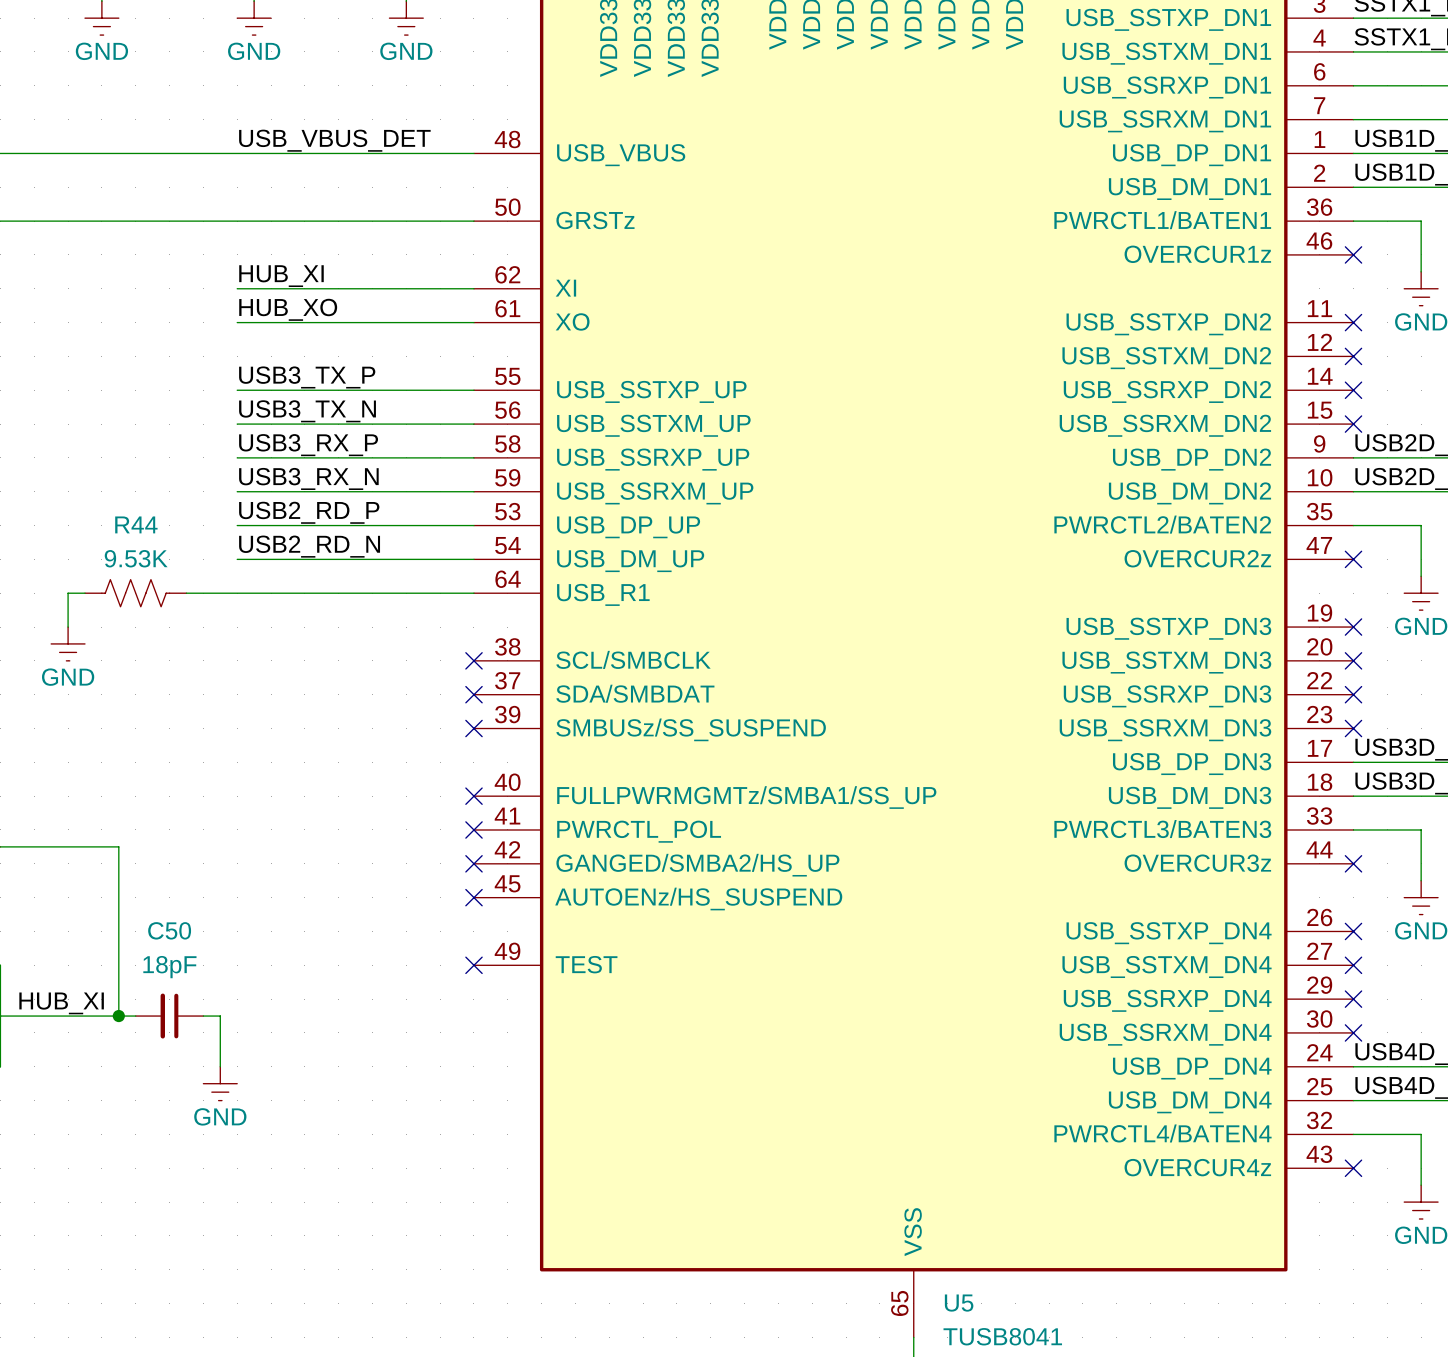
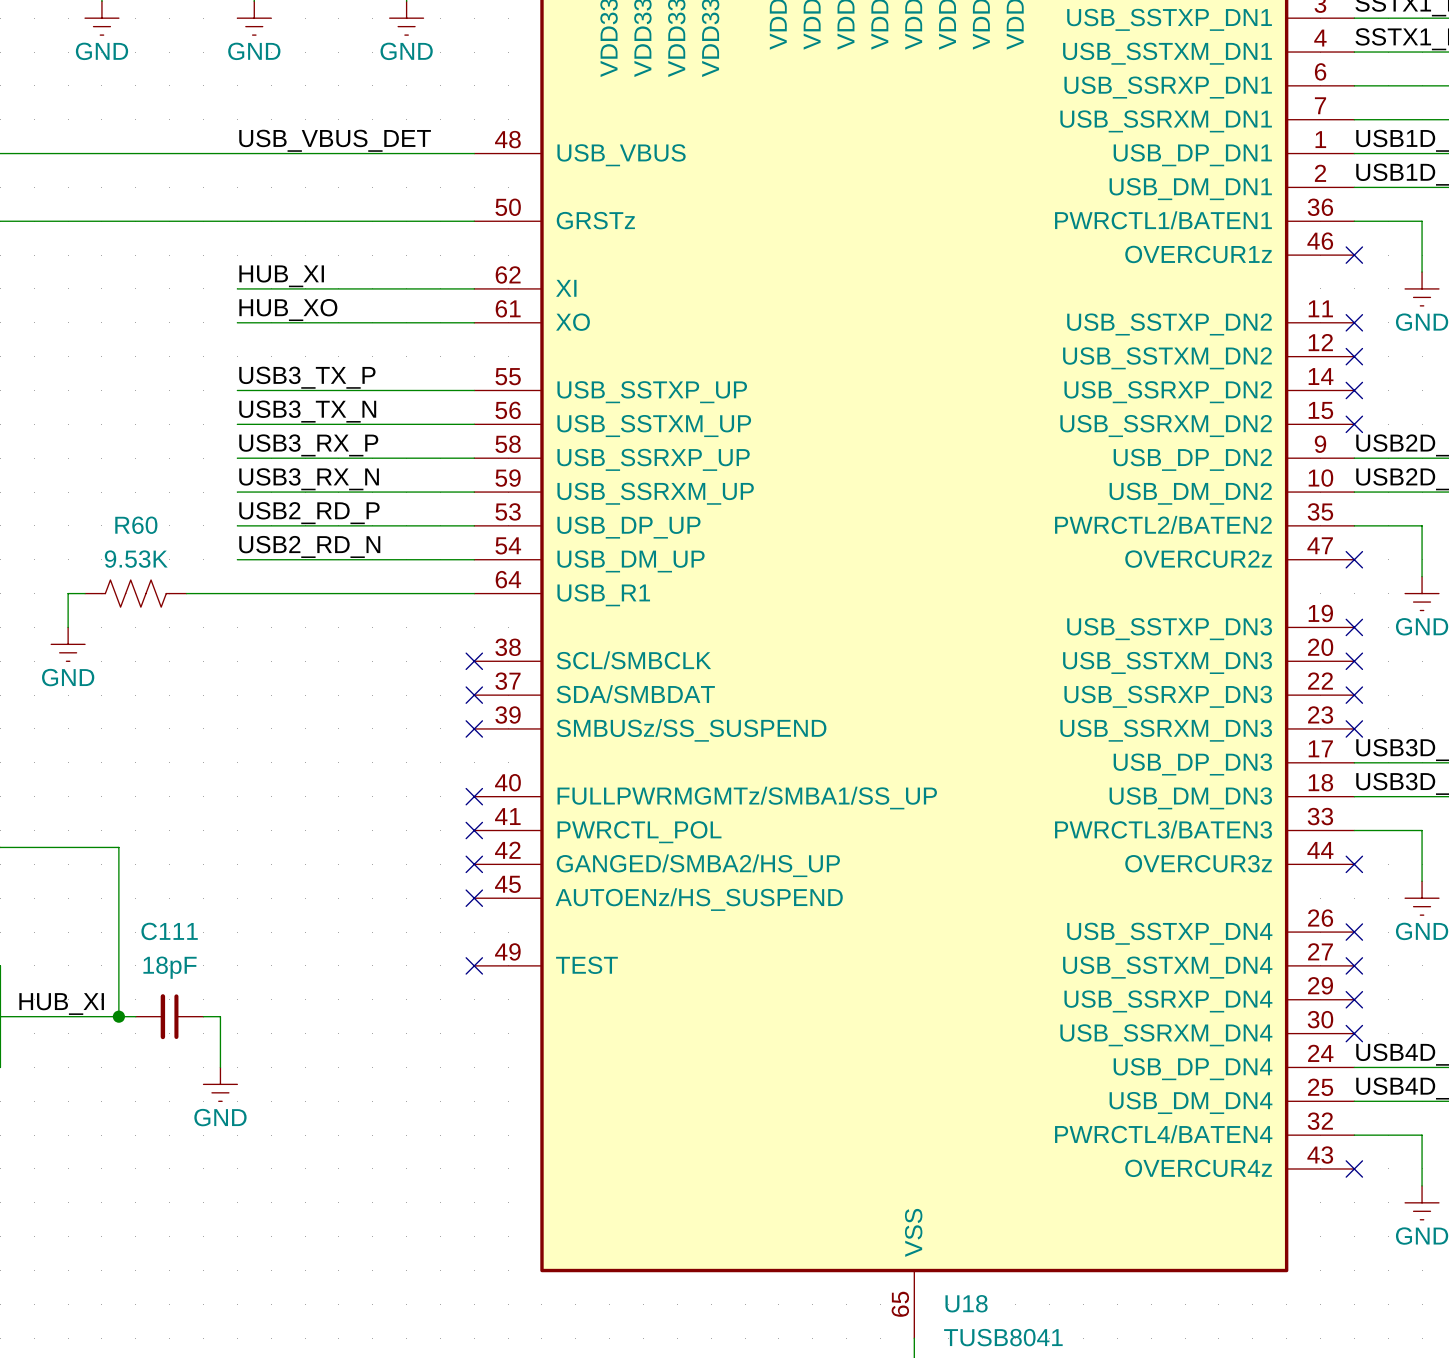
R44 name: R44 (136, 524) -> R60 (136, 525)
C50 name: C50 (169, 930) -> C111 (169, 931)
U5 name: U5 (959, 1303) -> U18 (966, 1303)

